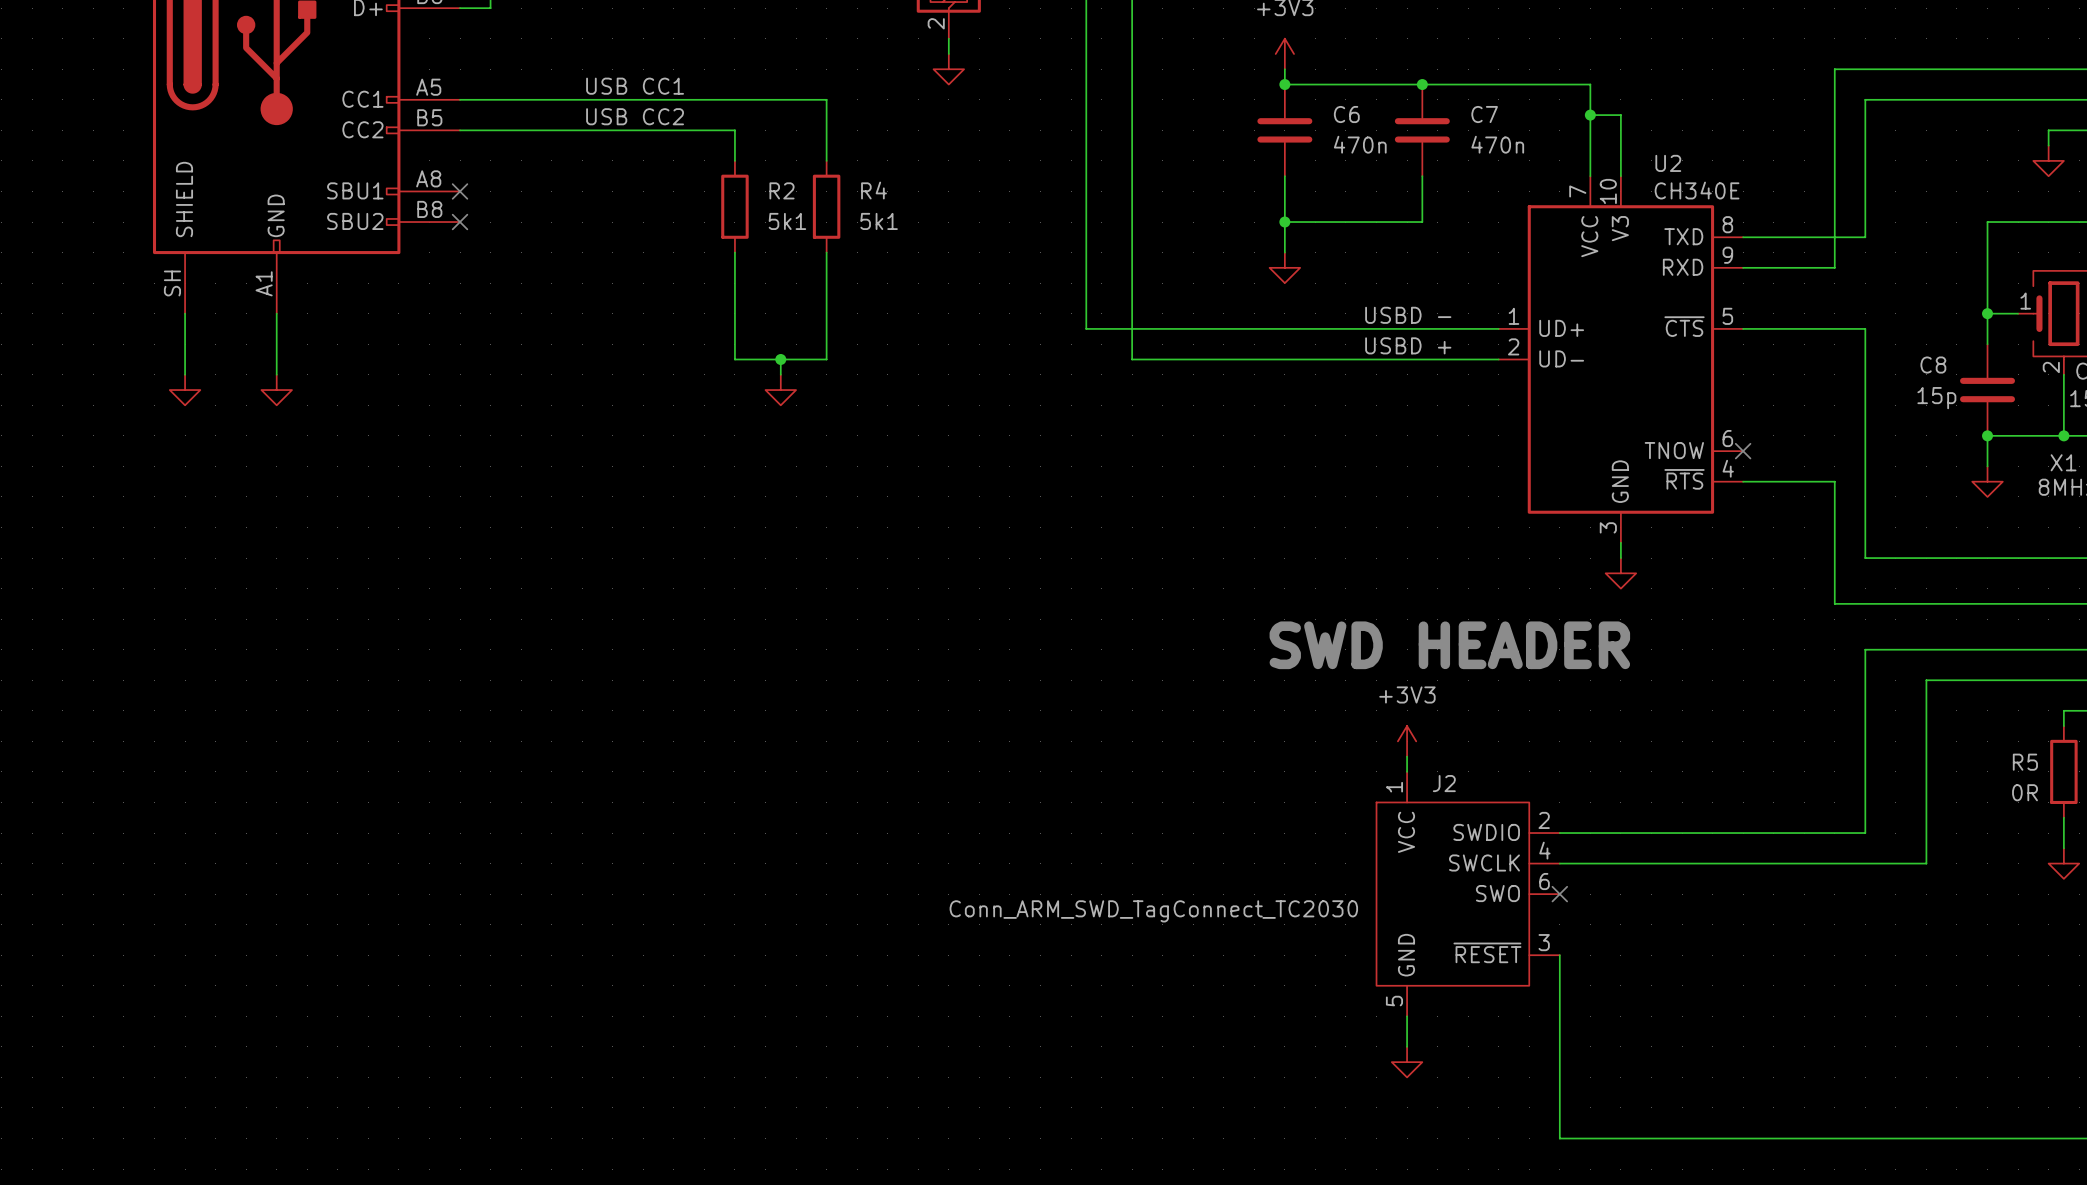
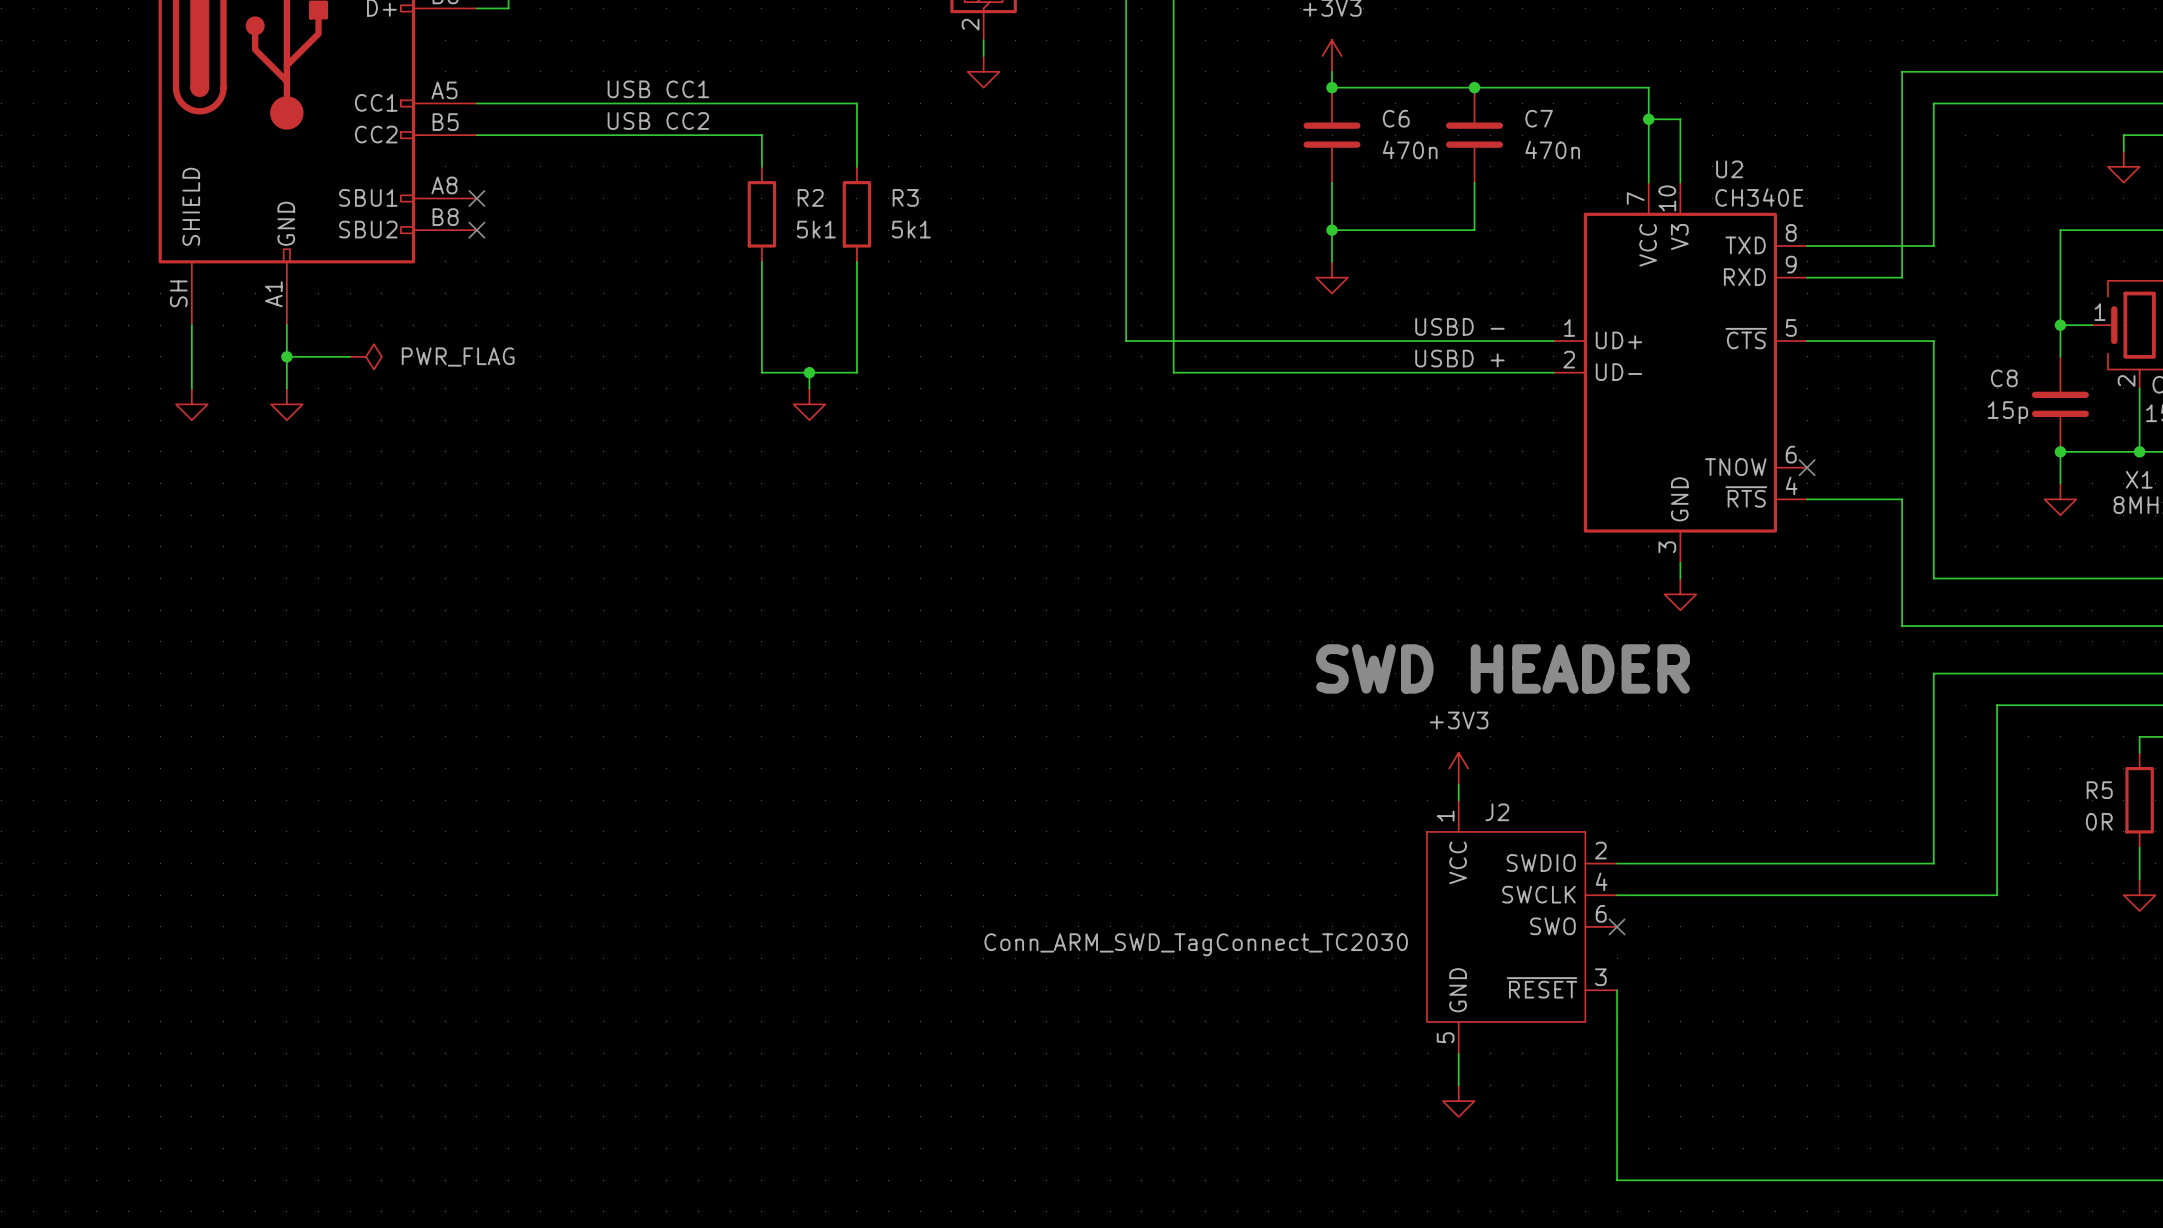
R4 name: R4 (874, 190) -> R3 (905, 197)
wire: none -> (286, 356) (350, 356)
junction: none -> (286, 356)
power symbol: none -> PWR_FLAG (366, 356)

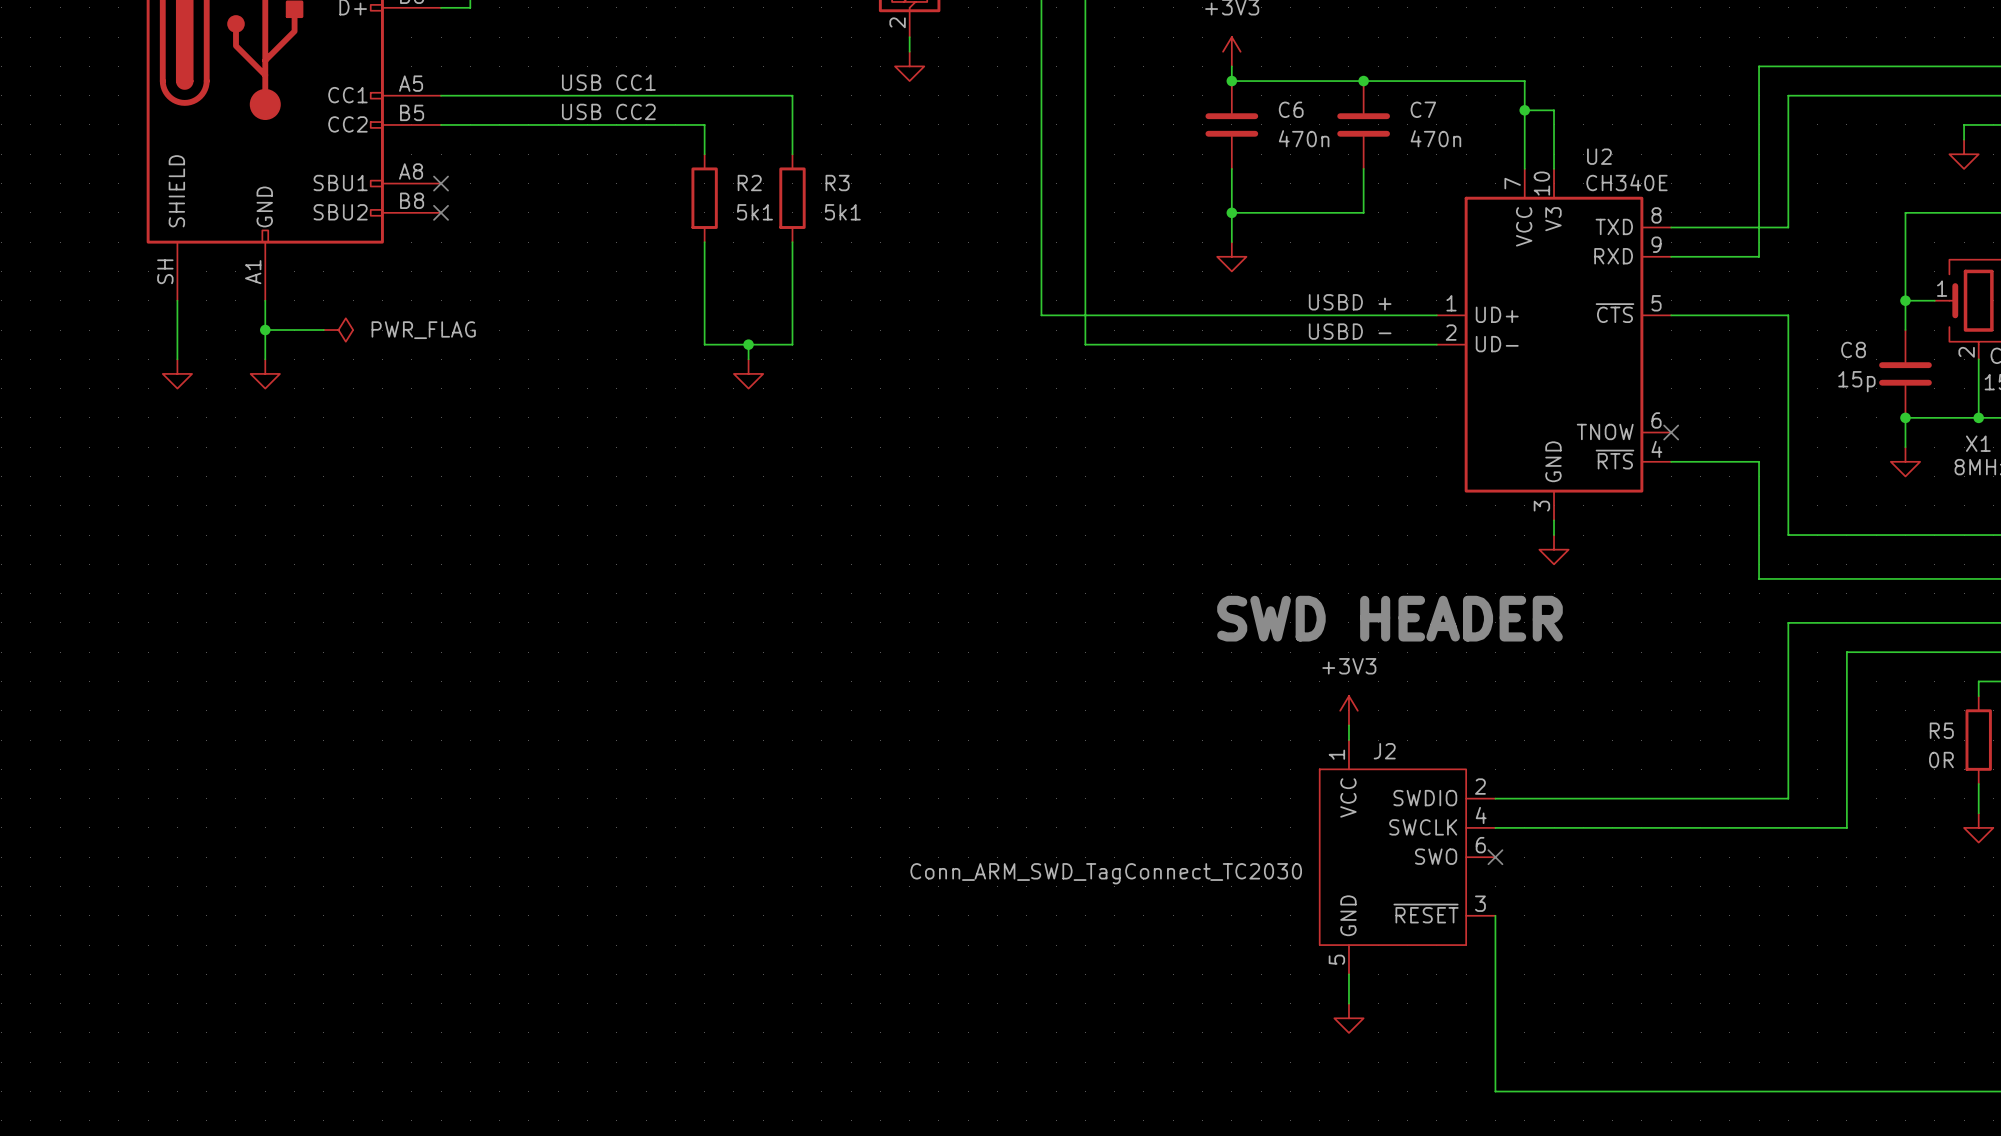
label: USBD - (1459, 326) -> USBD + (1350, 302)
label: USBD + (1459, 358) -> USBD - (1350, 331)

